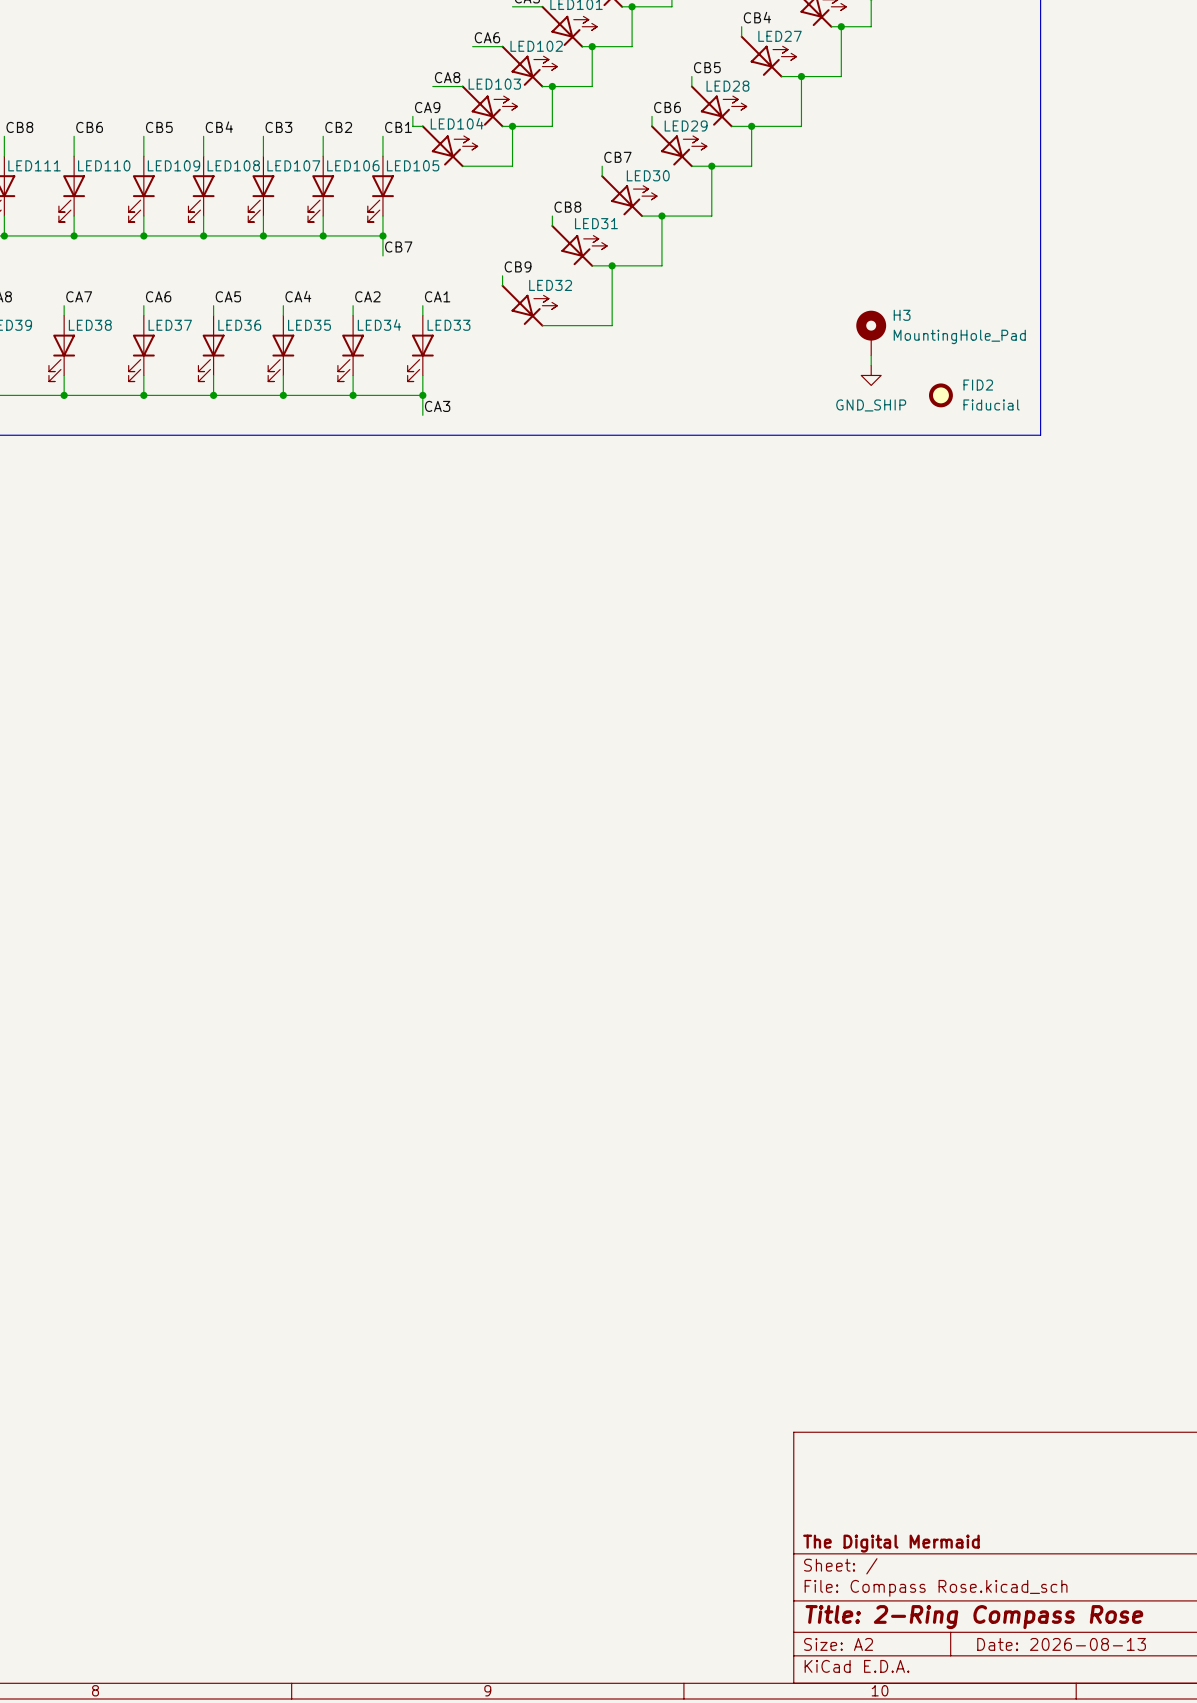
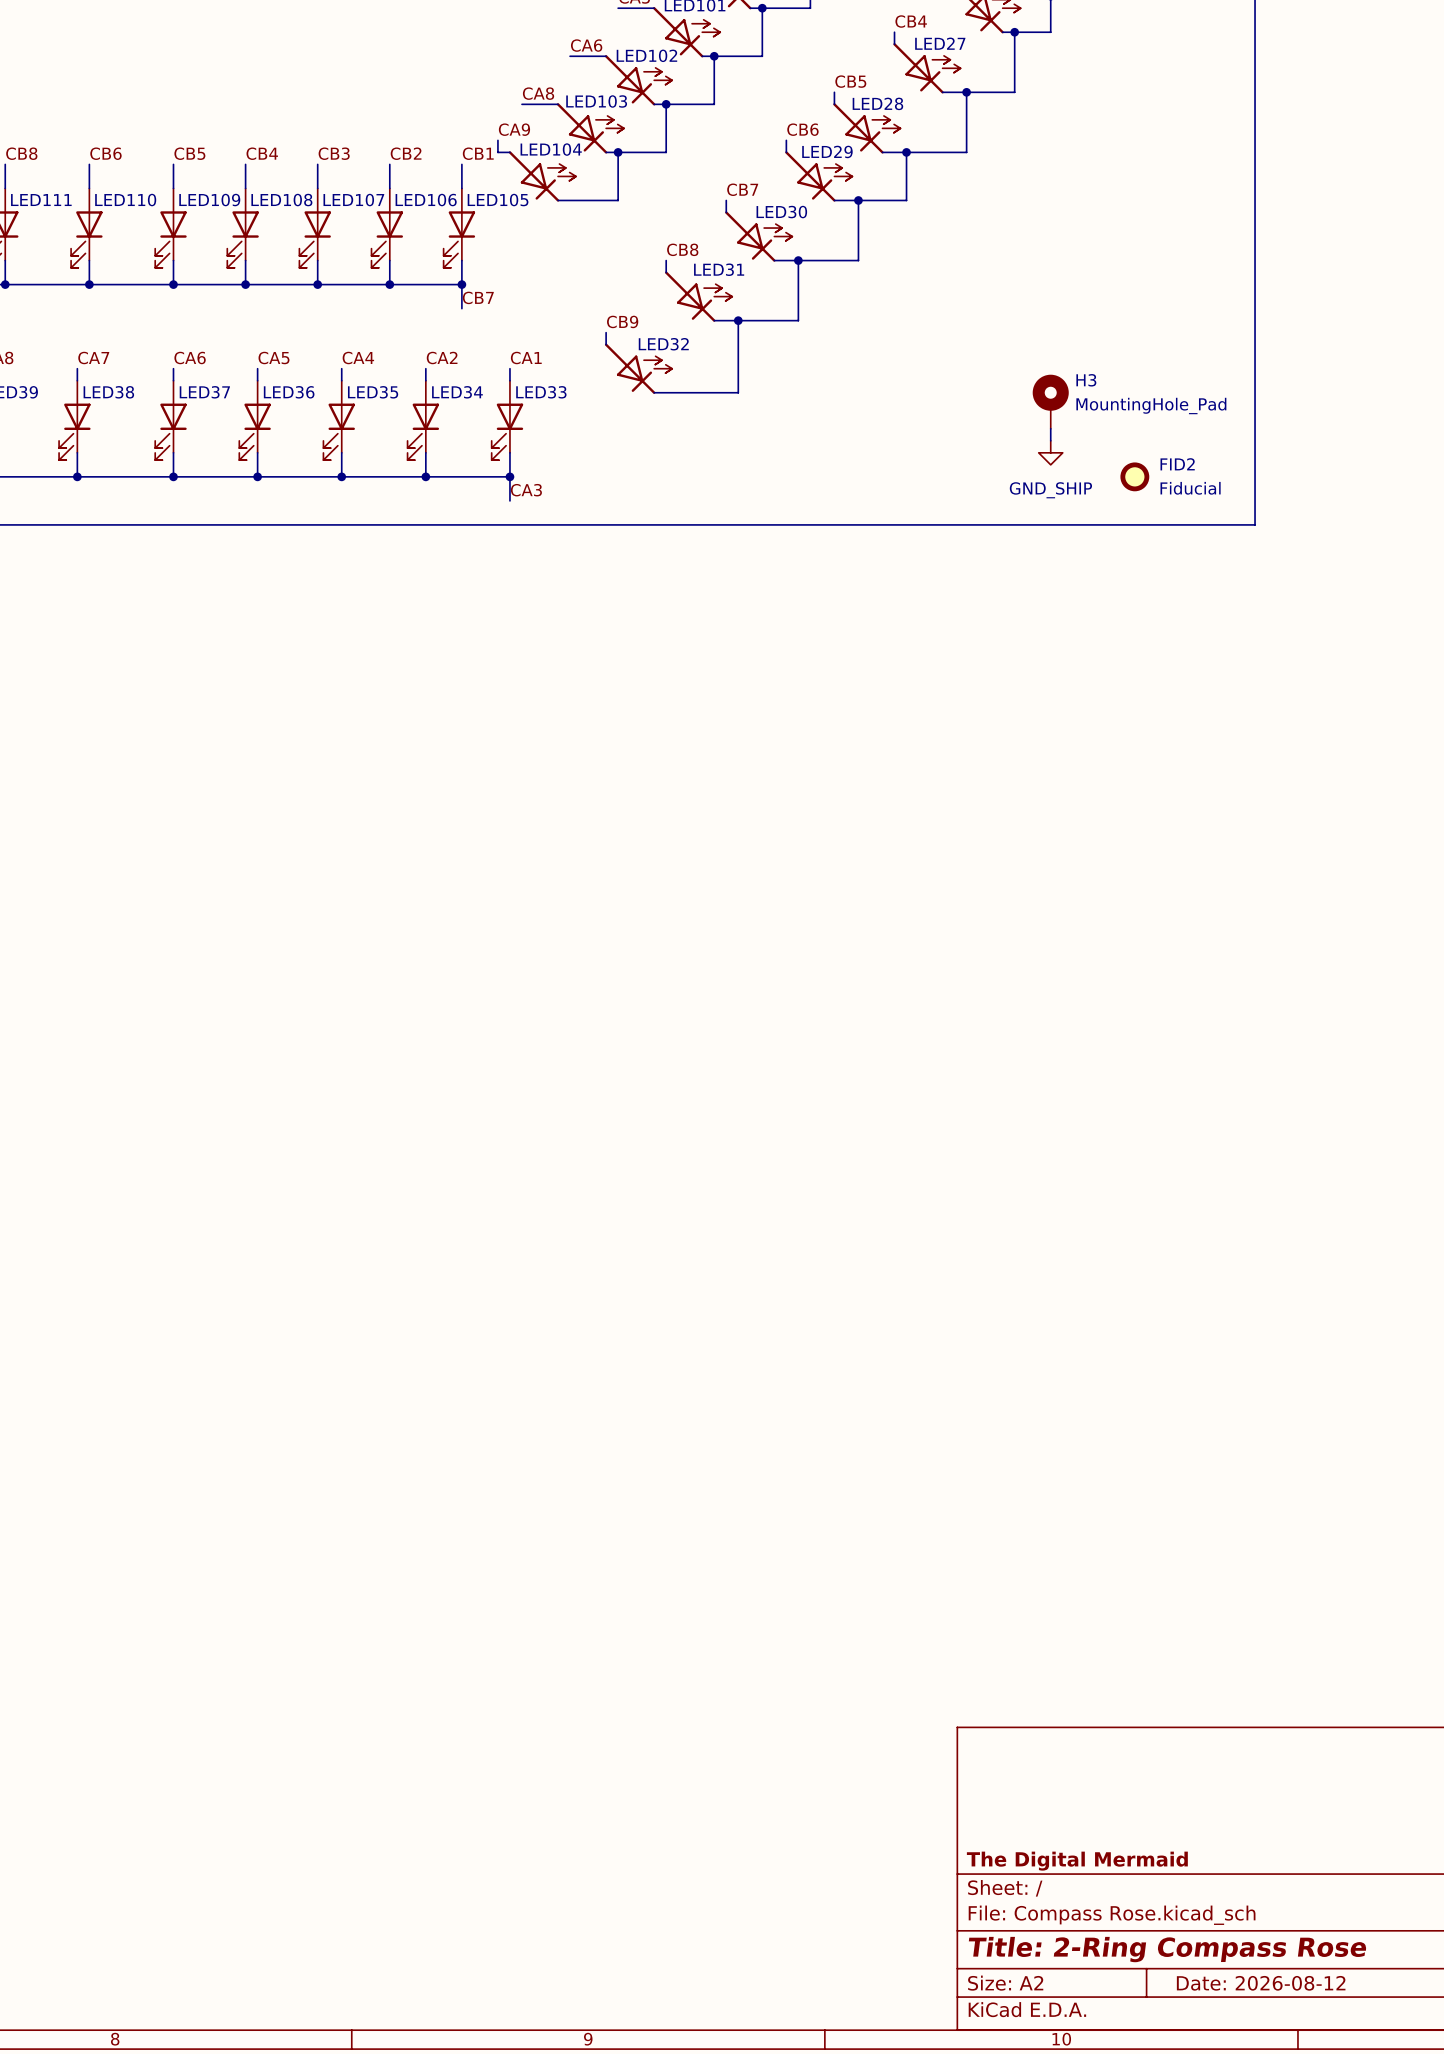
title block: Date: 2026-08-13 (1061, 1644) -> Date: 2026-08-12 (1261, 1983)

